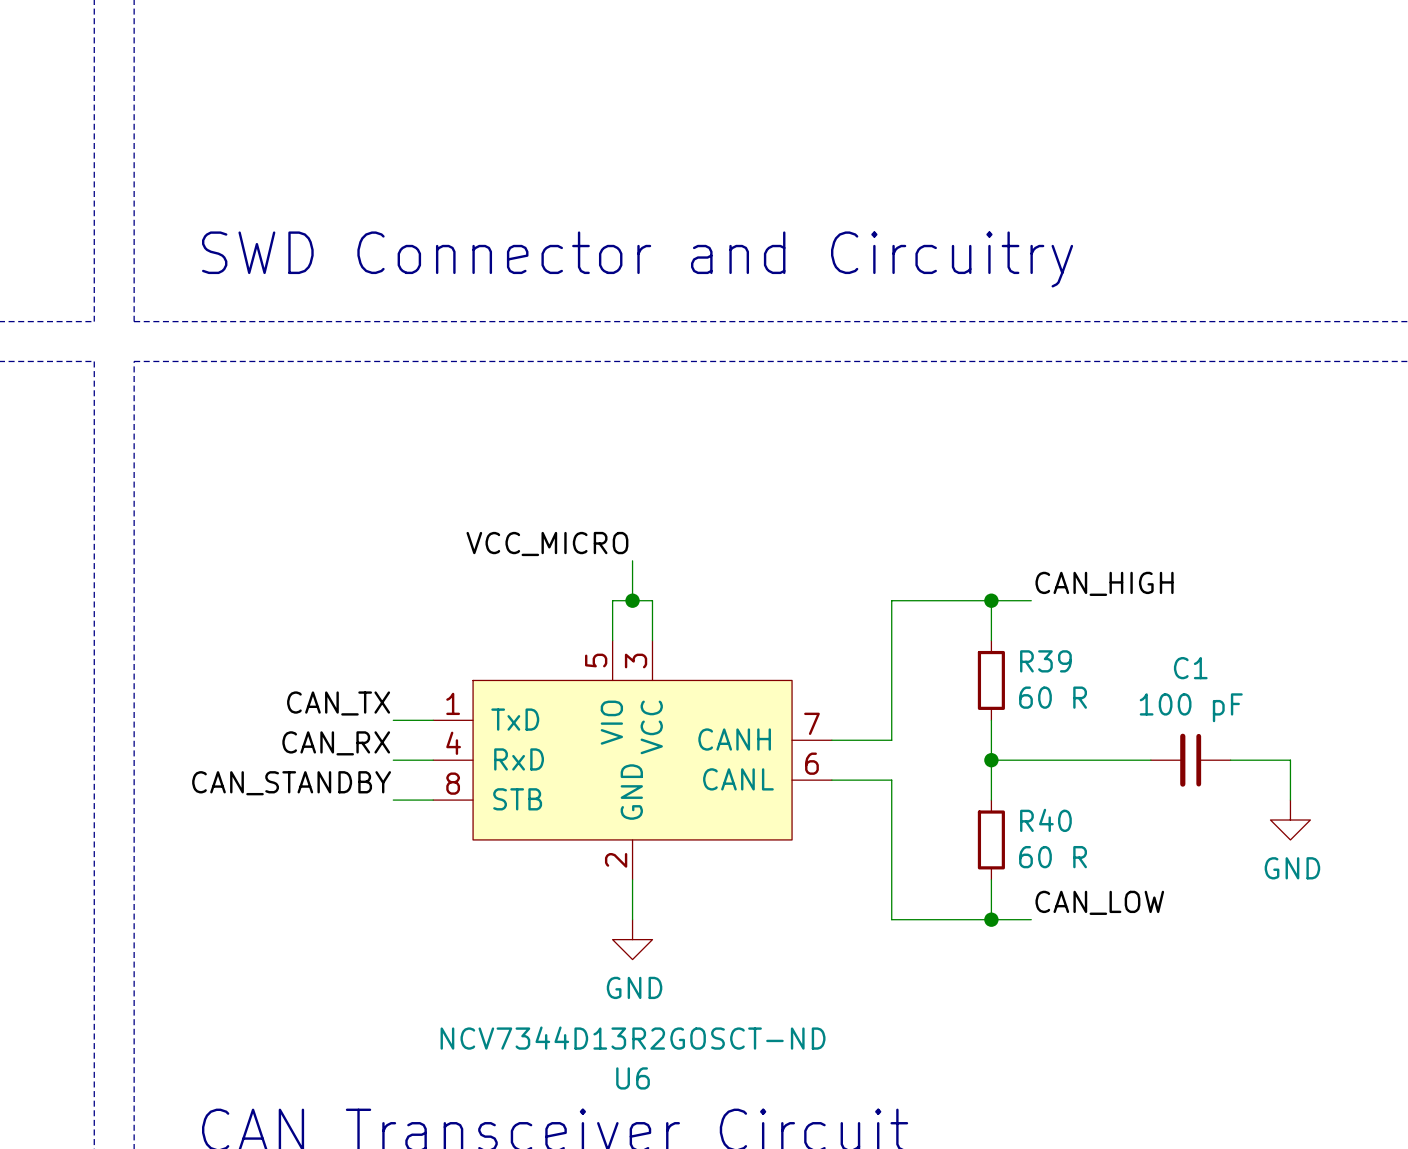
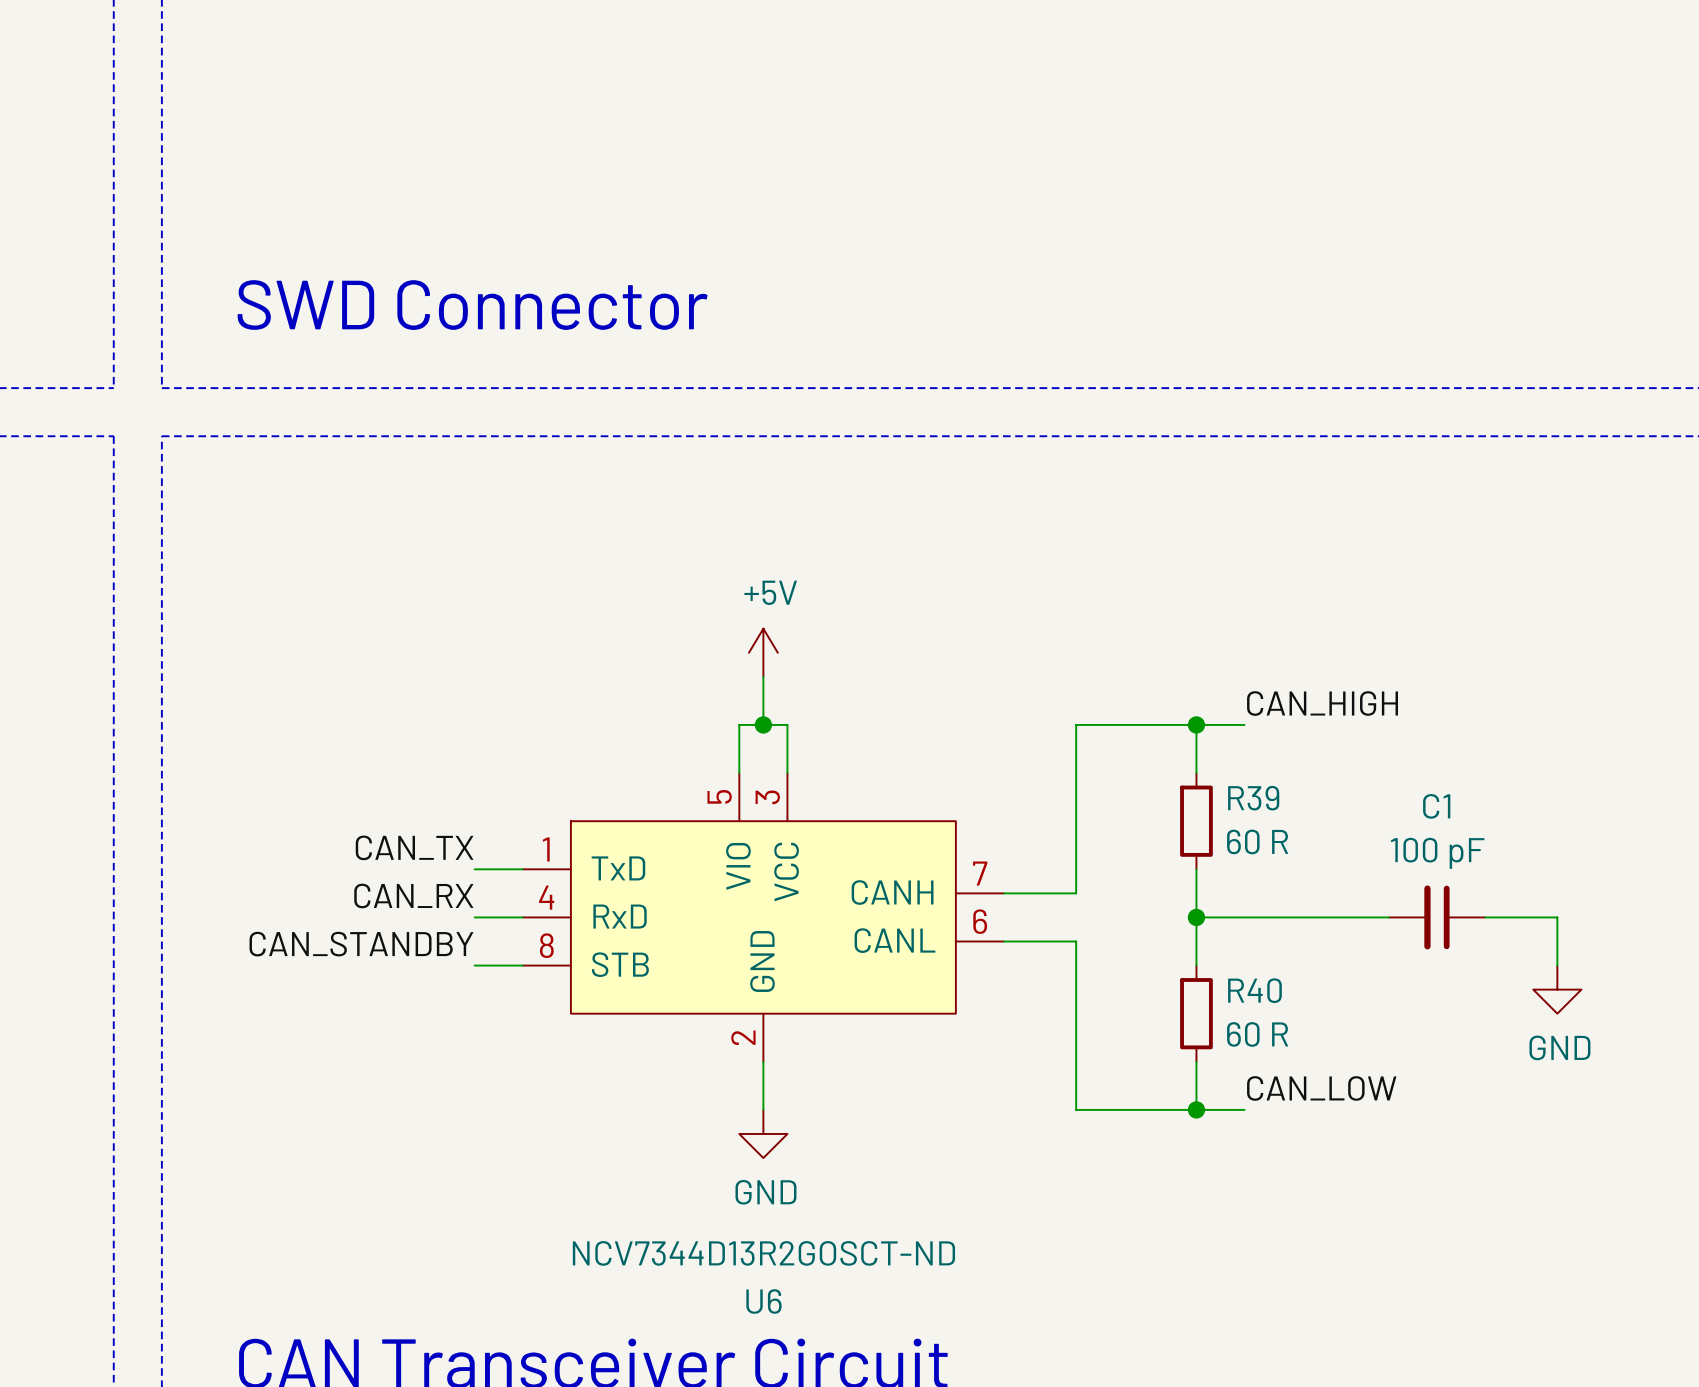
text: SWD Connector and Circuitry (637, 259) -> SWD Connector (472, 305)
power symbol: none -> +5V (763, 652)
label: VCC_MICRO (547, 543) -> none

